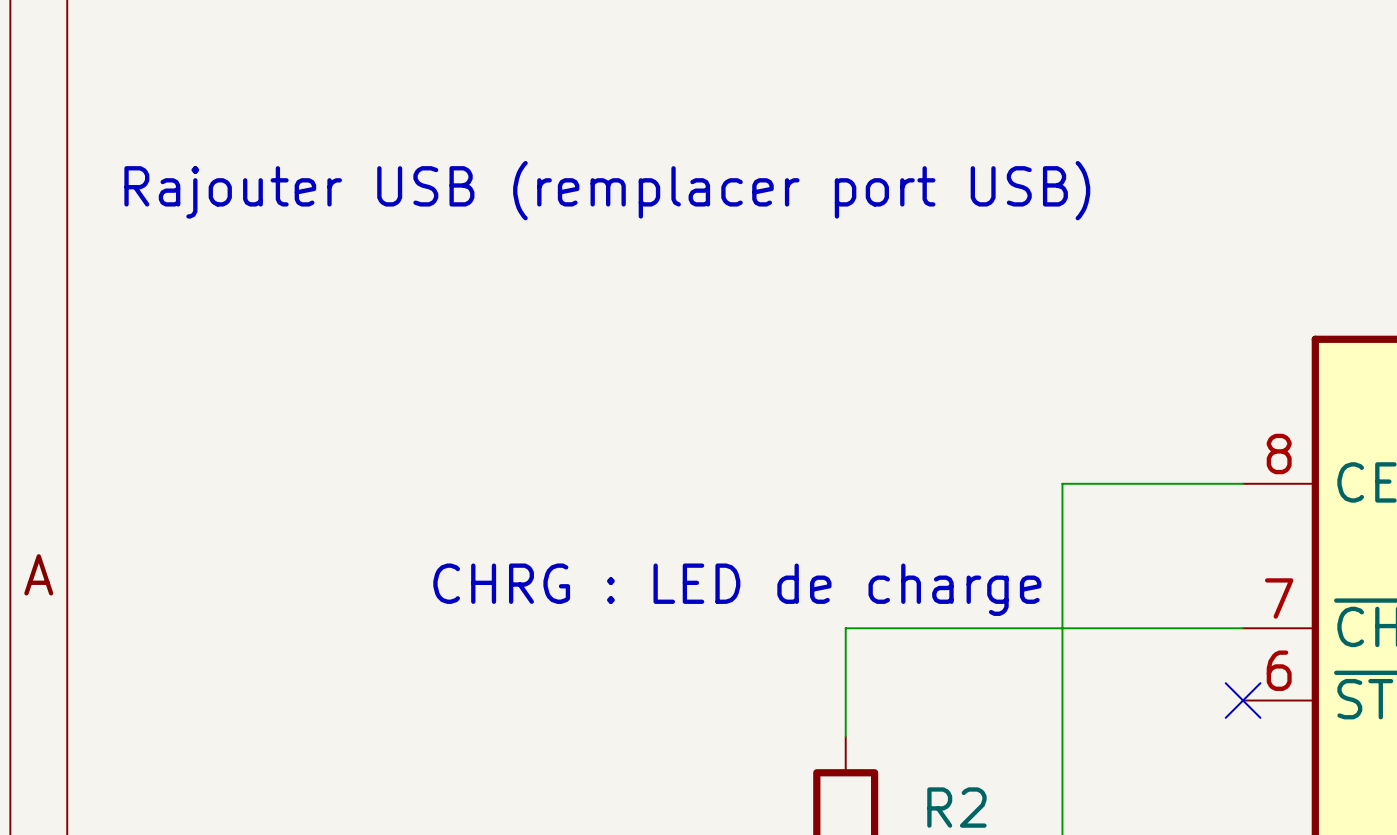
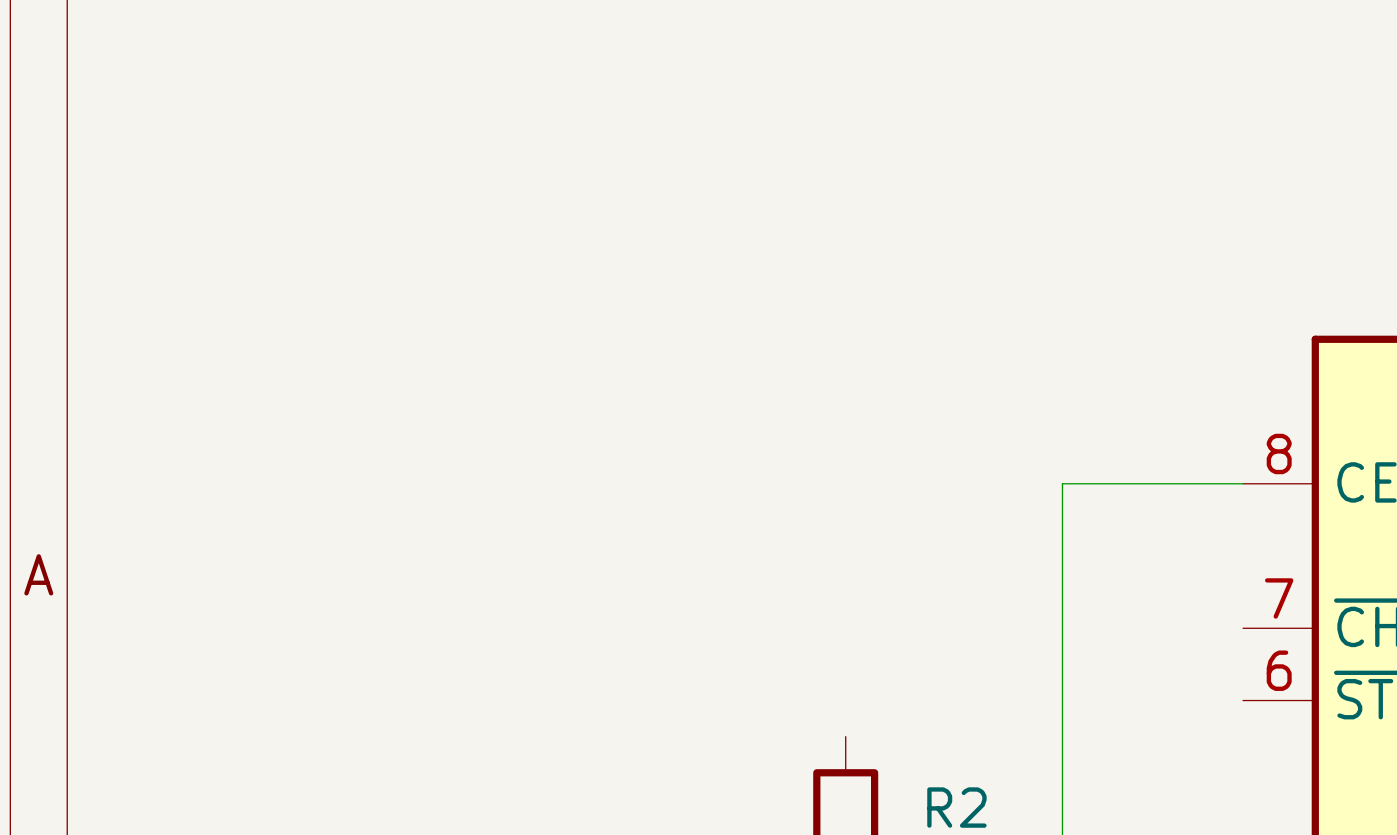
text: Rajouter USB (remplacer port USB) (607, 190) -> none
text: CHRG : LED de charge (737, 589) -> none
wire: (1243, 628) (845, 628) (845, 736) -> none
no-connect mark: (1243, 700) -> none

